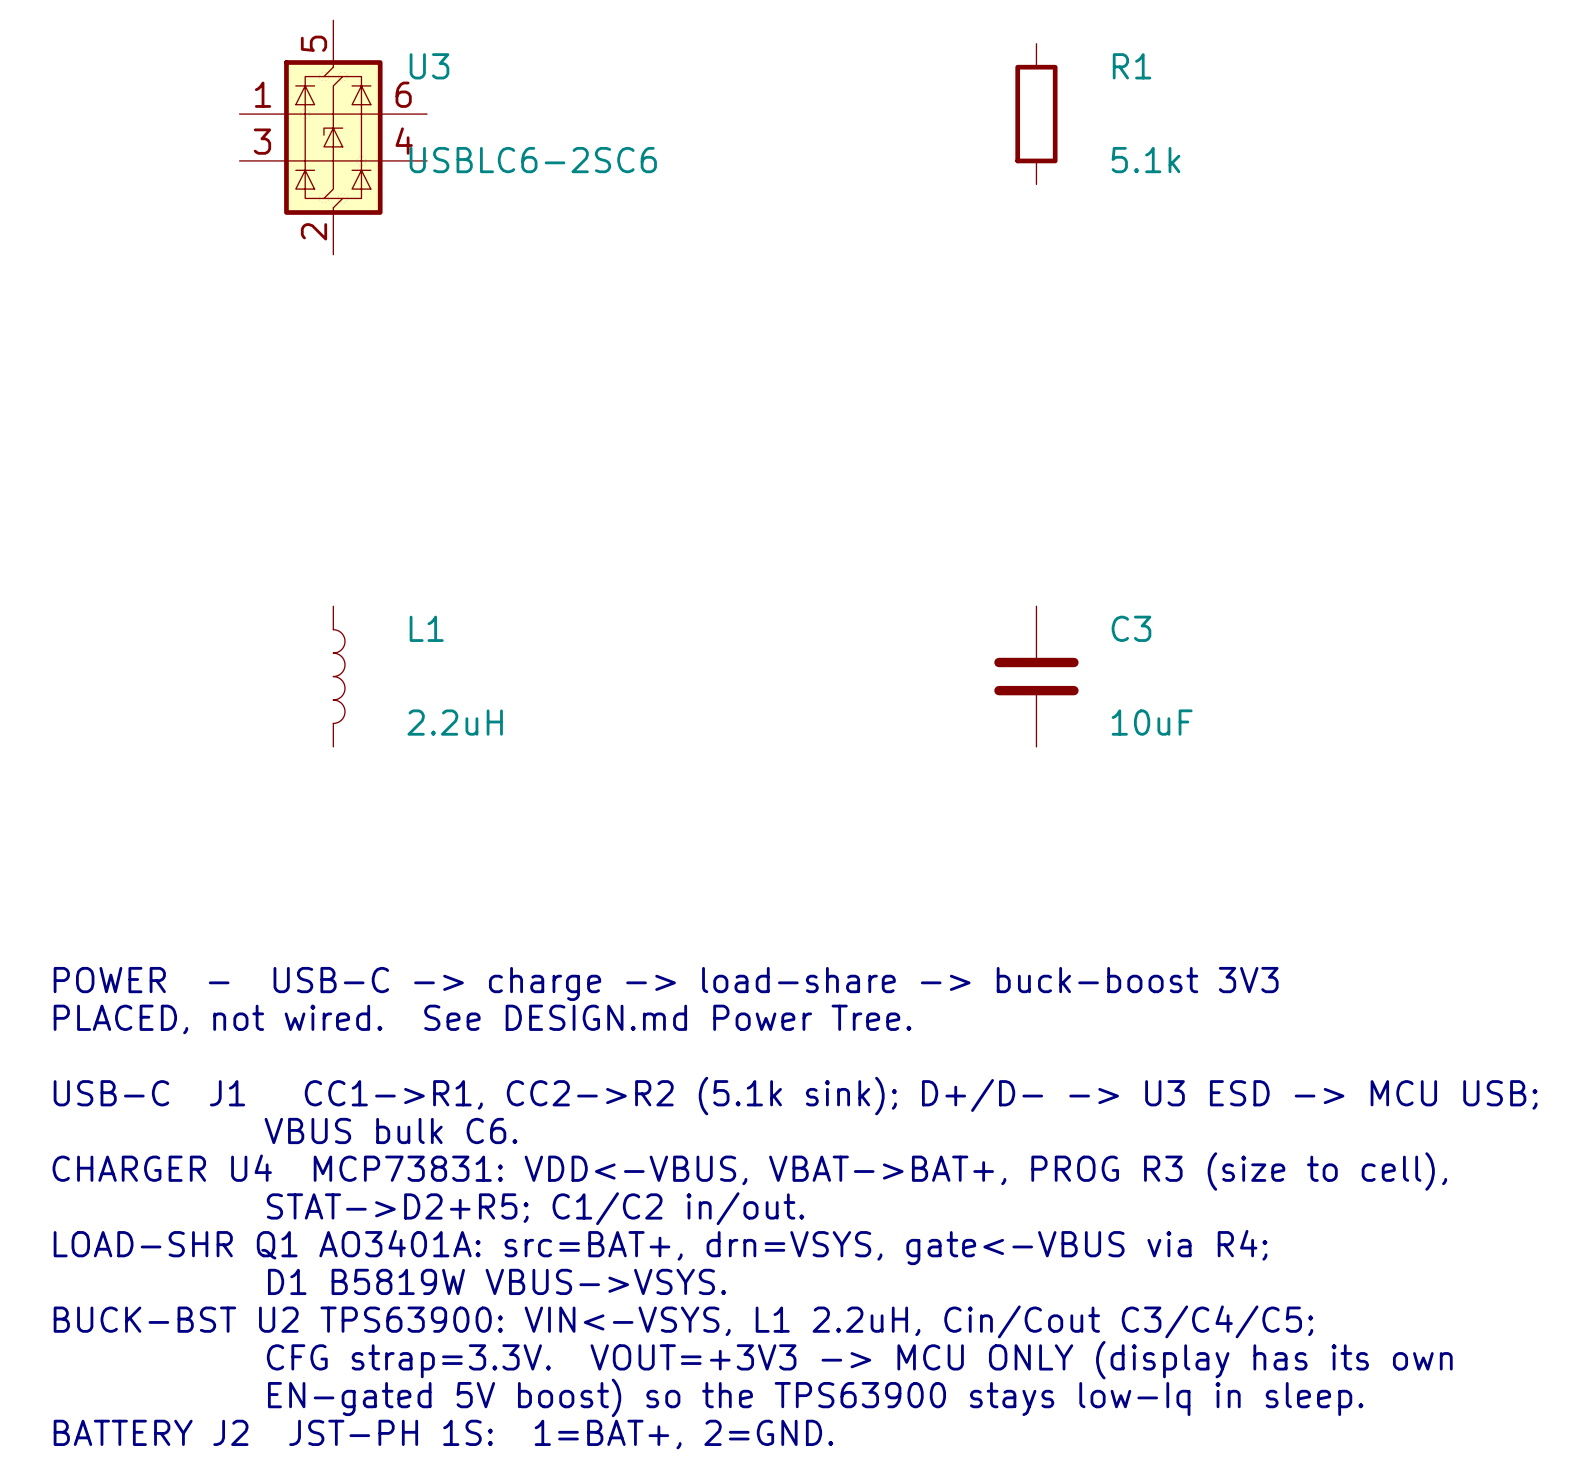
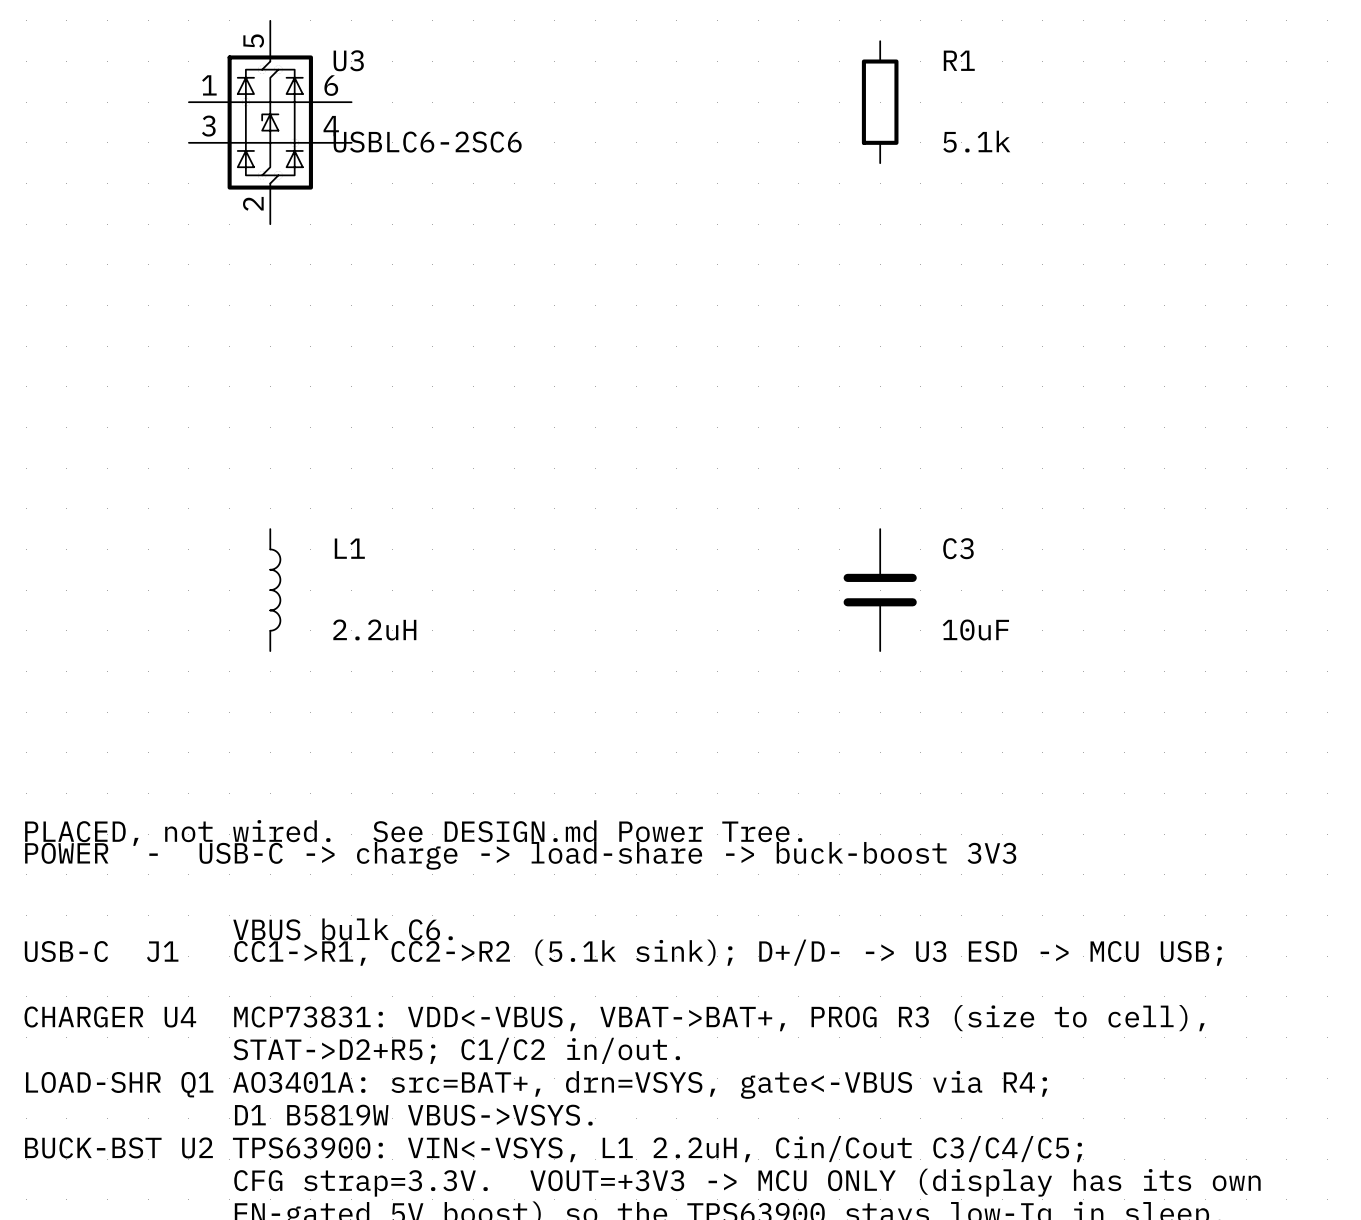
text position: PLACED, not wired. See DESIGN.md Power Tree. (482, 1019) -> PLACED, not wired. See DESIGN.md Power Tree. (413, 832)
text position: VBUS bulk C6. (391, 1130) -> VBUS bulk C6. (343, 929)

